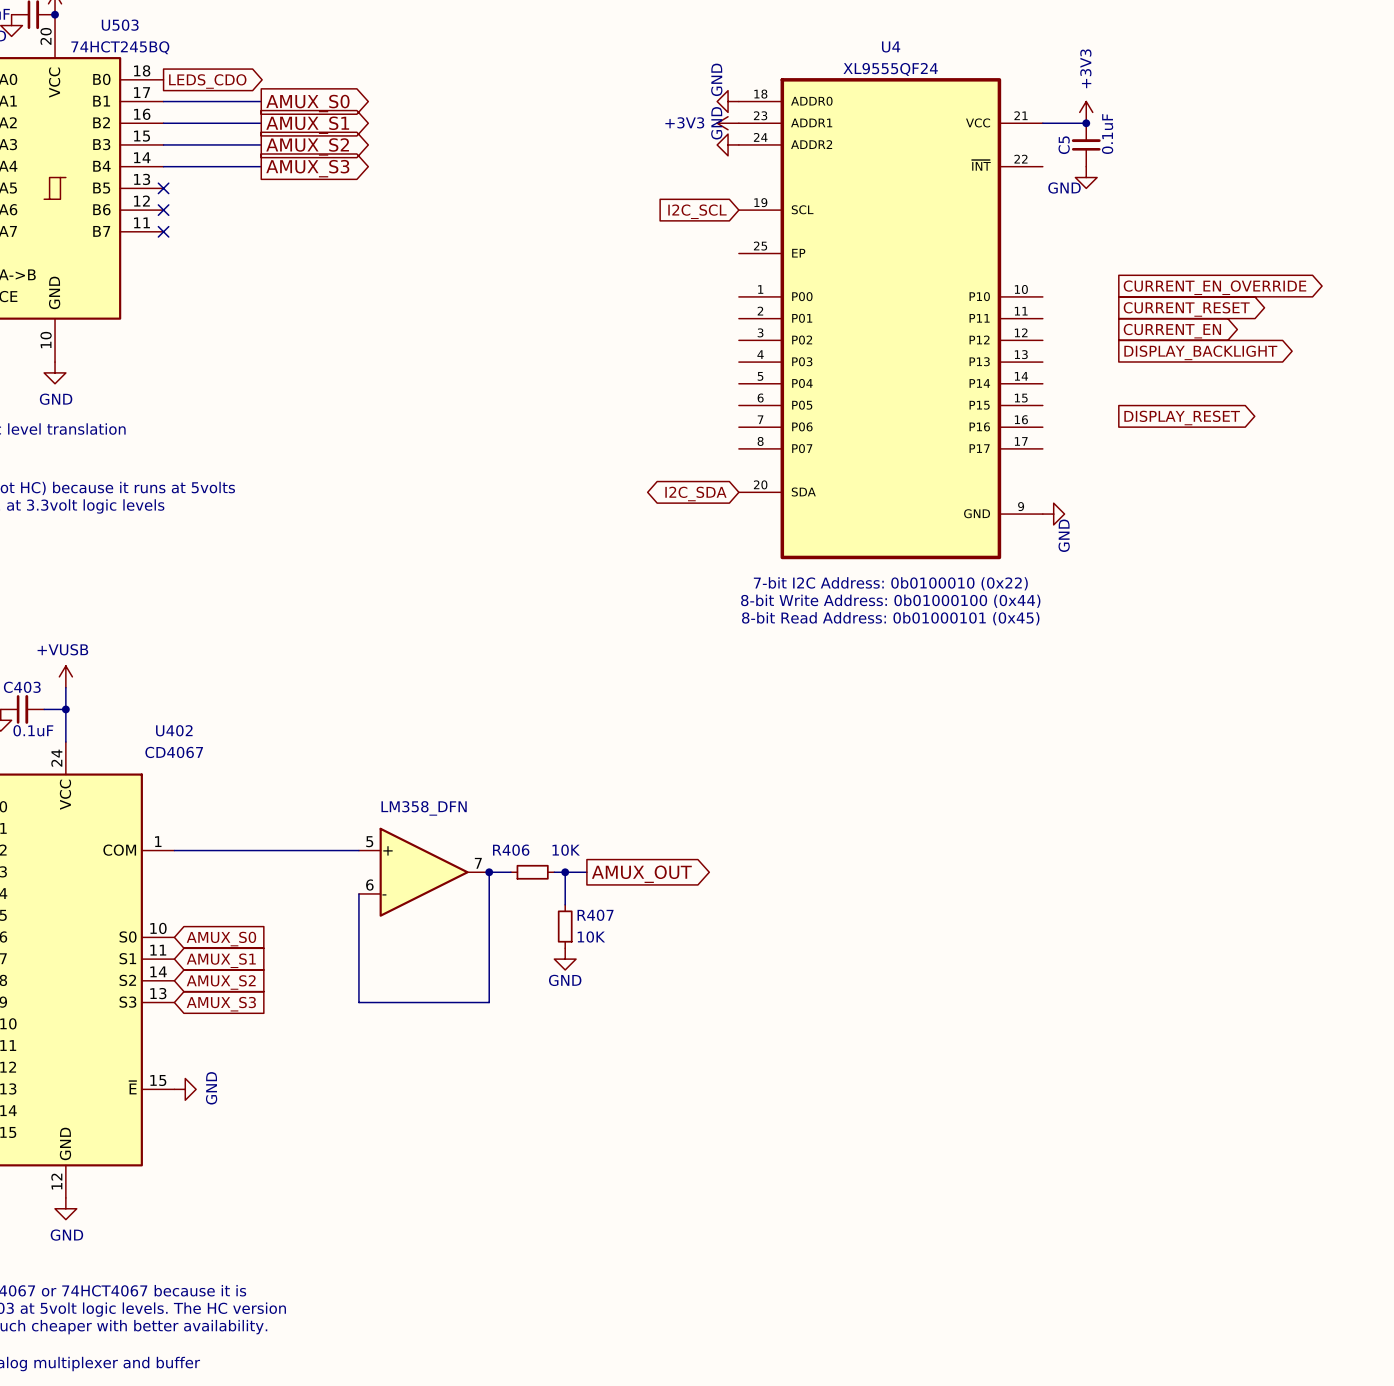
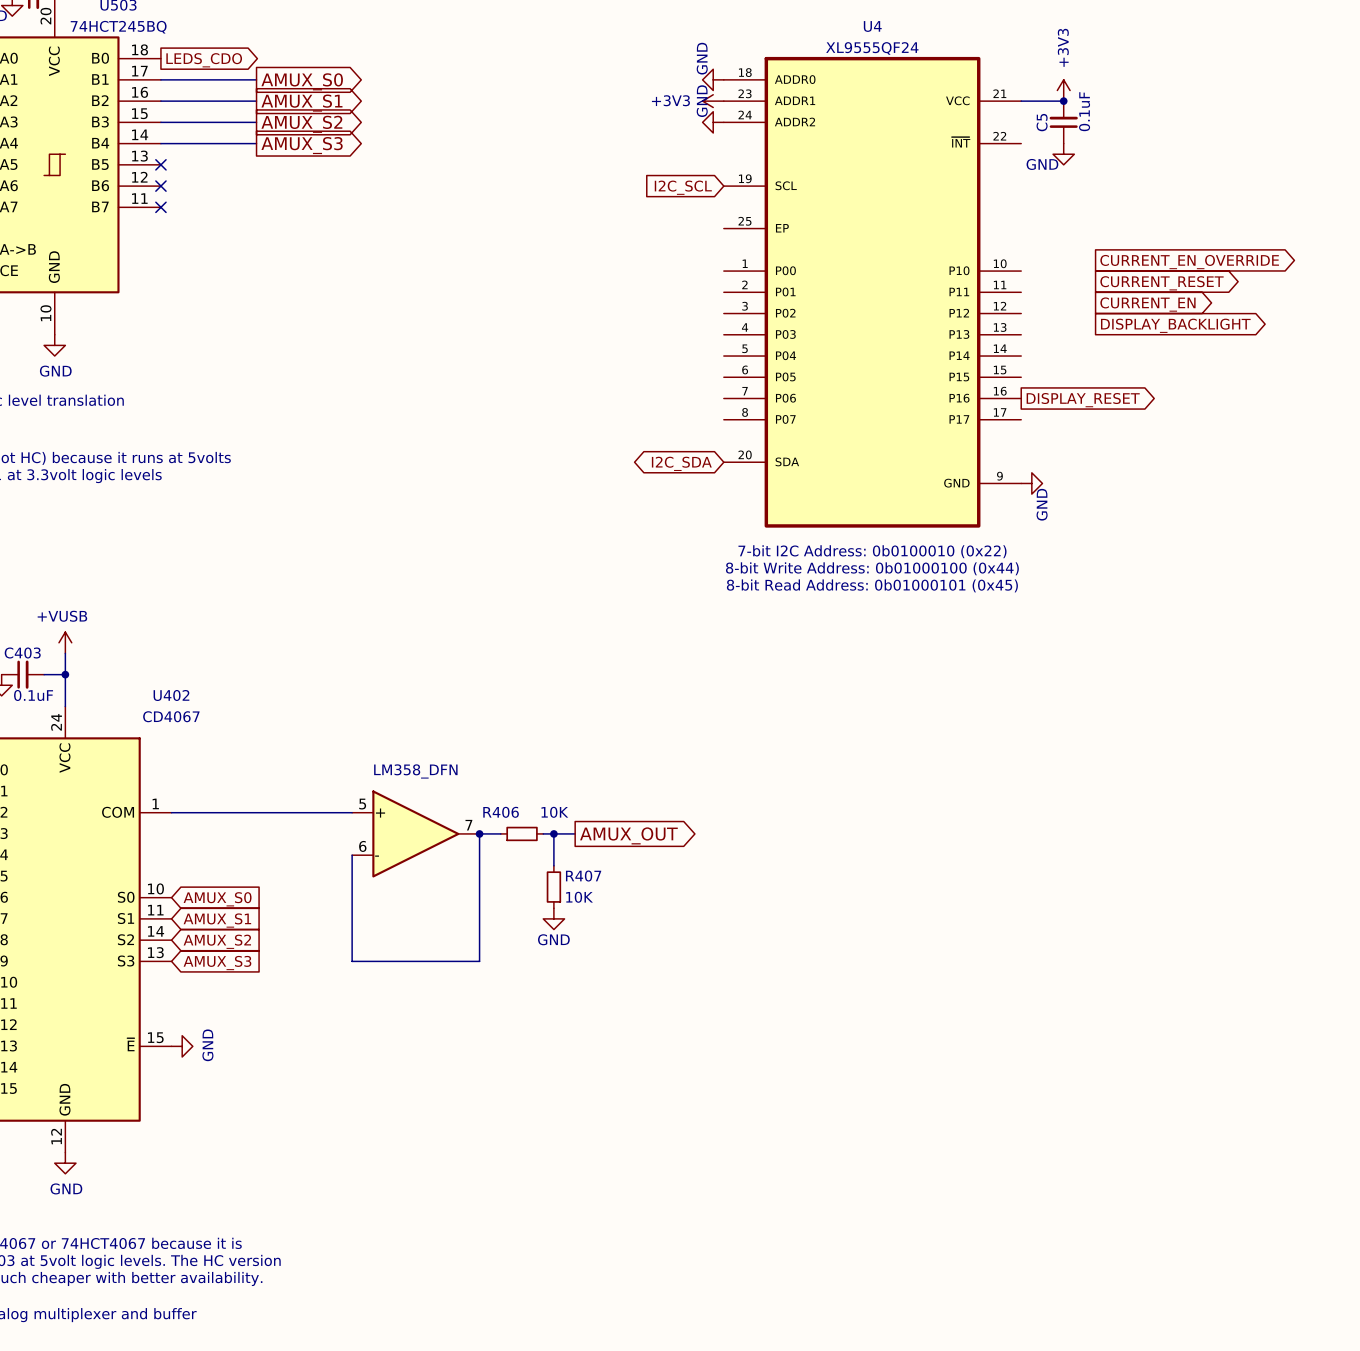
global label position: DISPLAY_RESET (1182, 418) -> DISPLAY_RESET (1083, 400)

